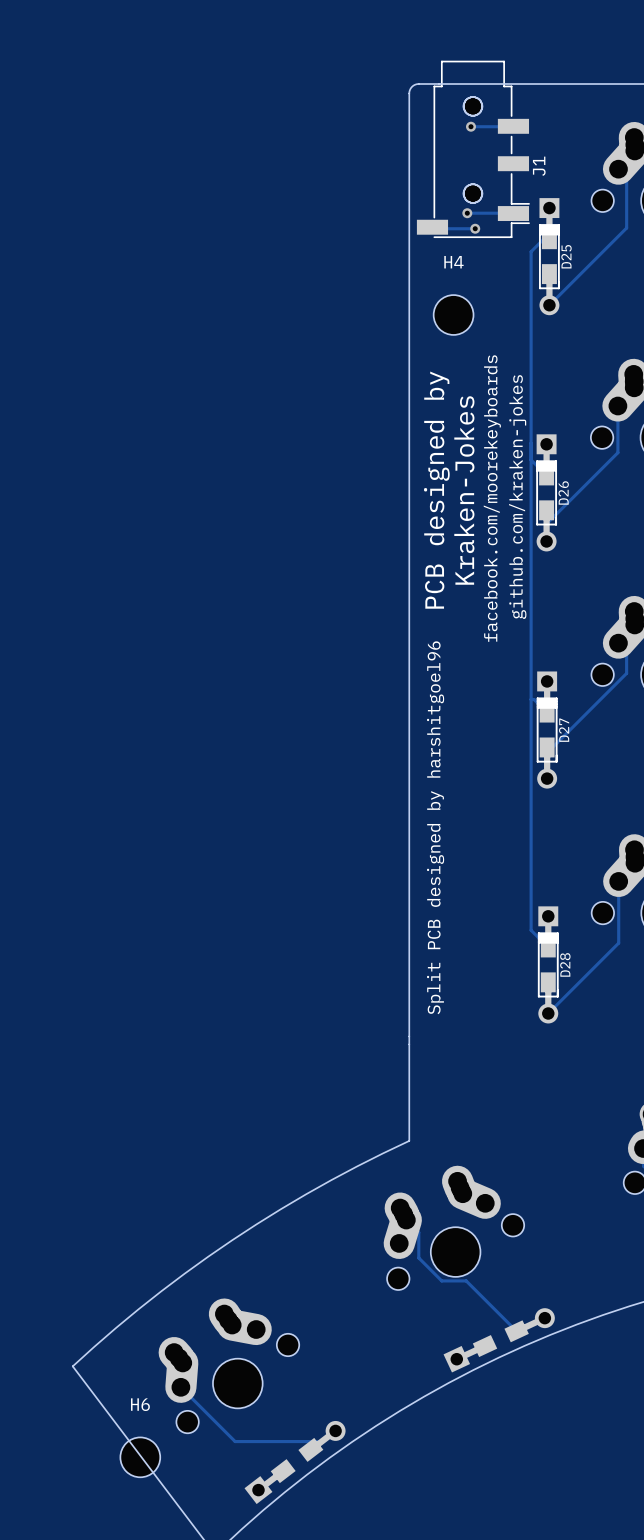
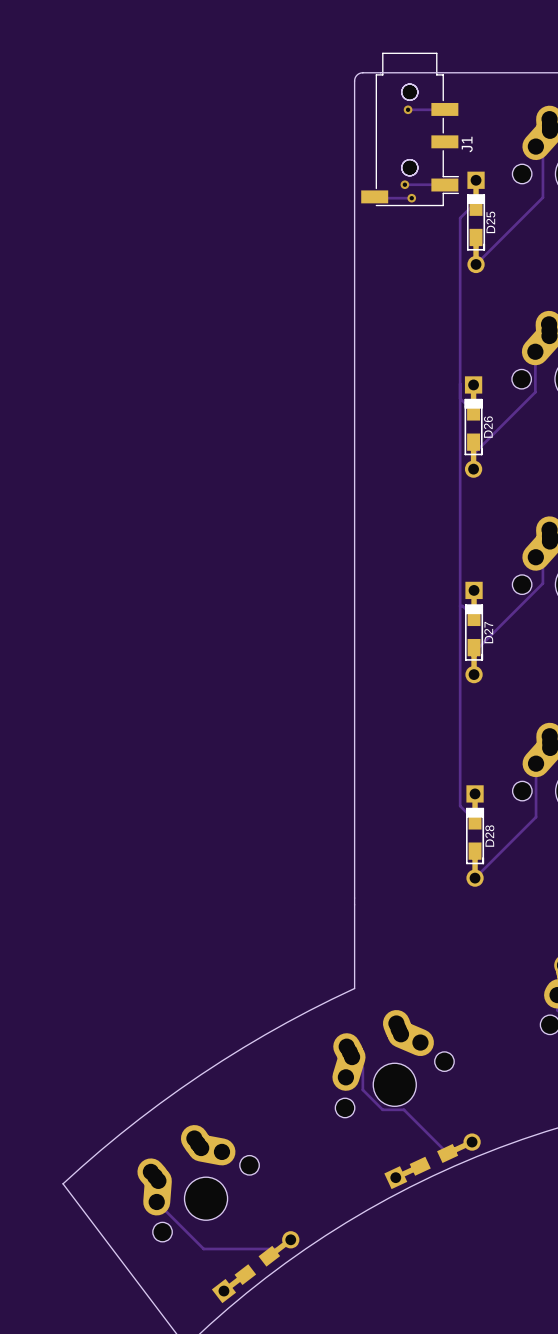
H4: (453, 315) -> none
text: PCB designed by (436, 490) -> none
text: Kraken-Jokes (464, 490) -> none
text: github.com/kraken-jokes (517, 497) -> none
text: facebook.com/moorekeyboards (492, 498) -> none
text: Split PCB designed by harshitgoel96 (435, 827) -> none
H6: (140, 1457) -> none

